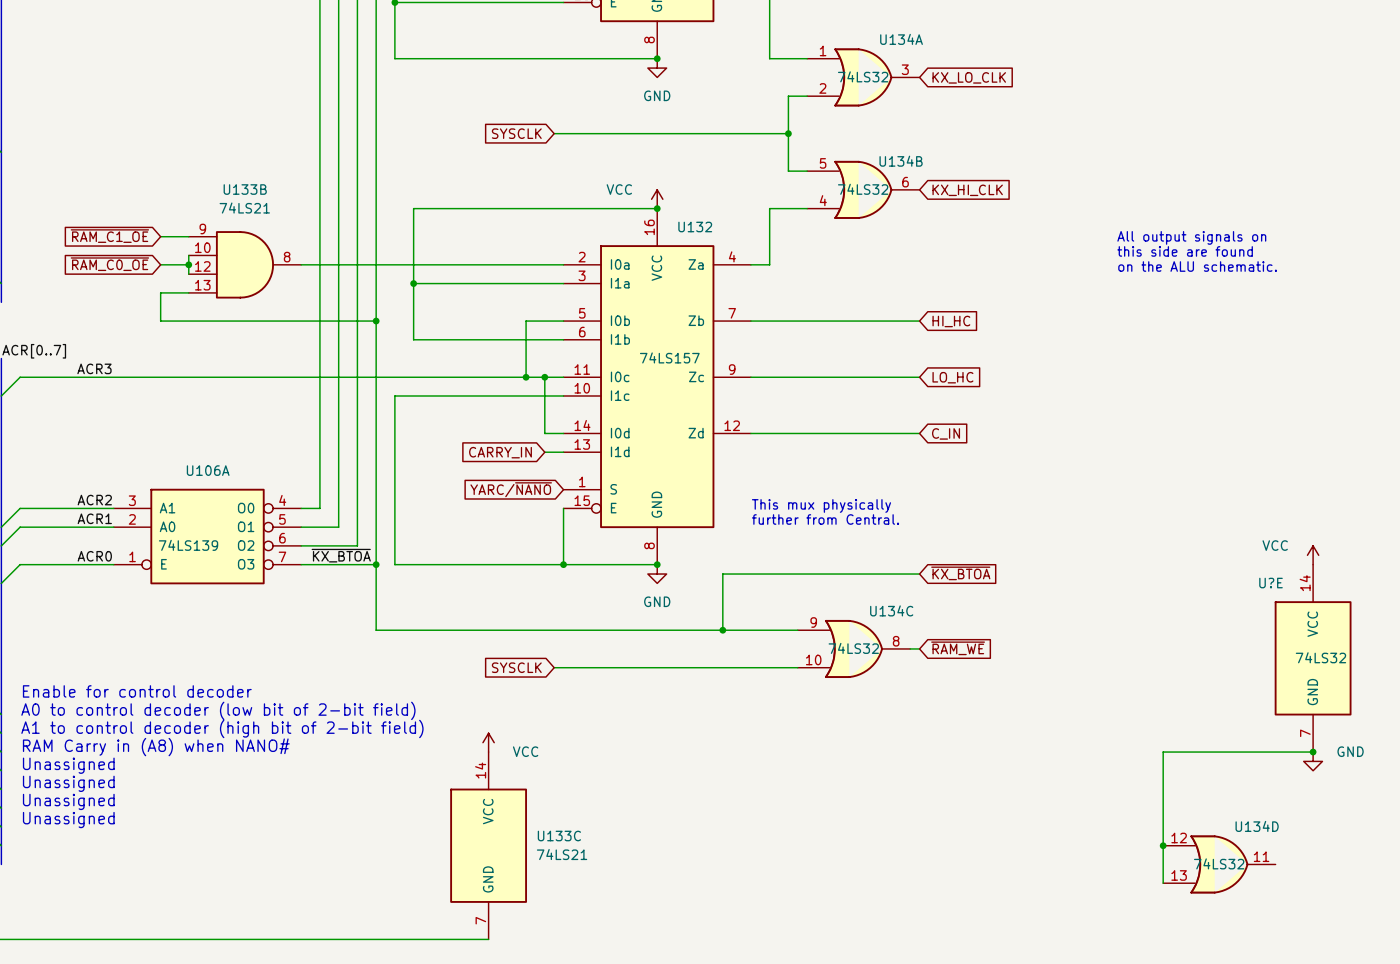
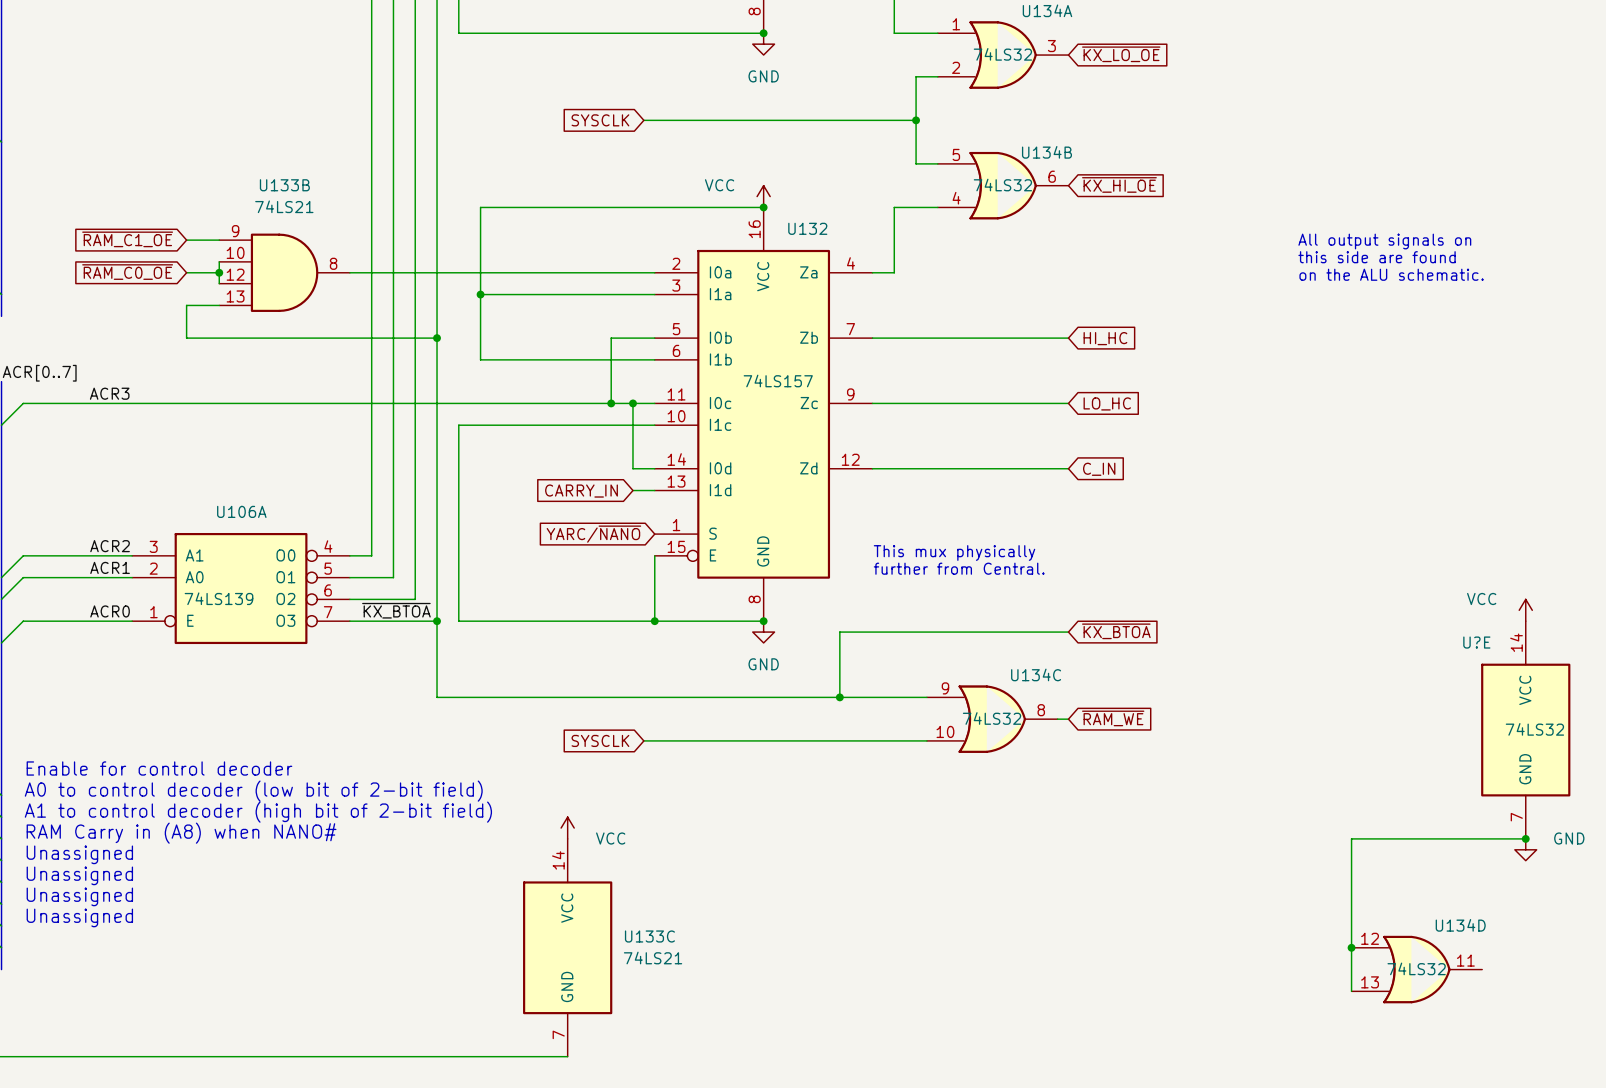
global label: KX_LO_CLK (969, 77) -> ~{KX_LO_OE} (1121, 54)
global label: KX_HI_CLK (967, 190) -> ~{KX_HI_OE} (1119, 184)

